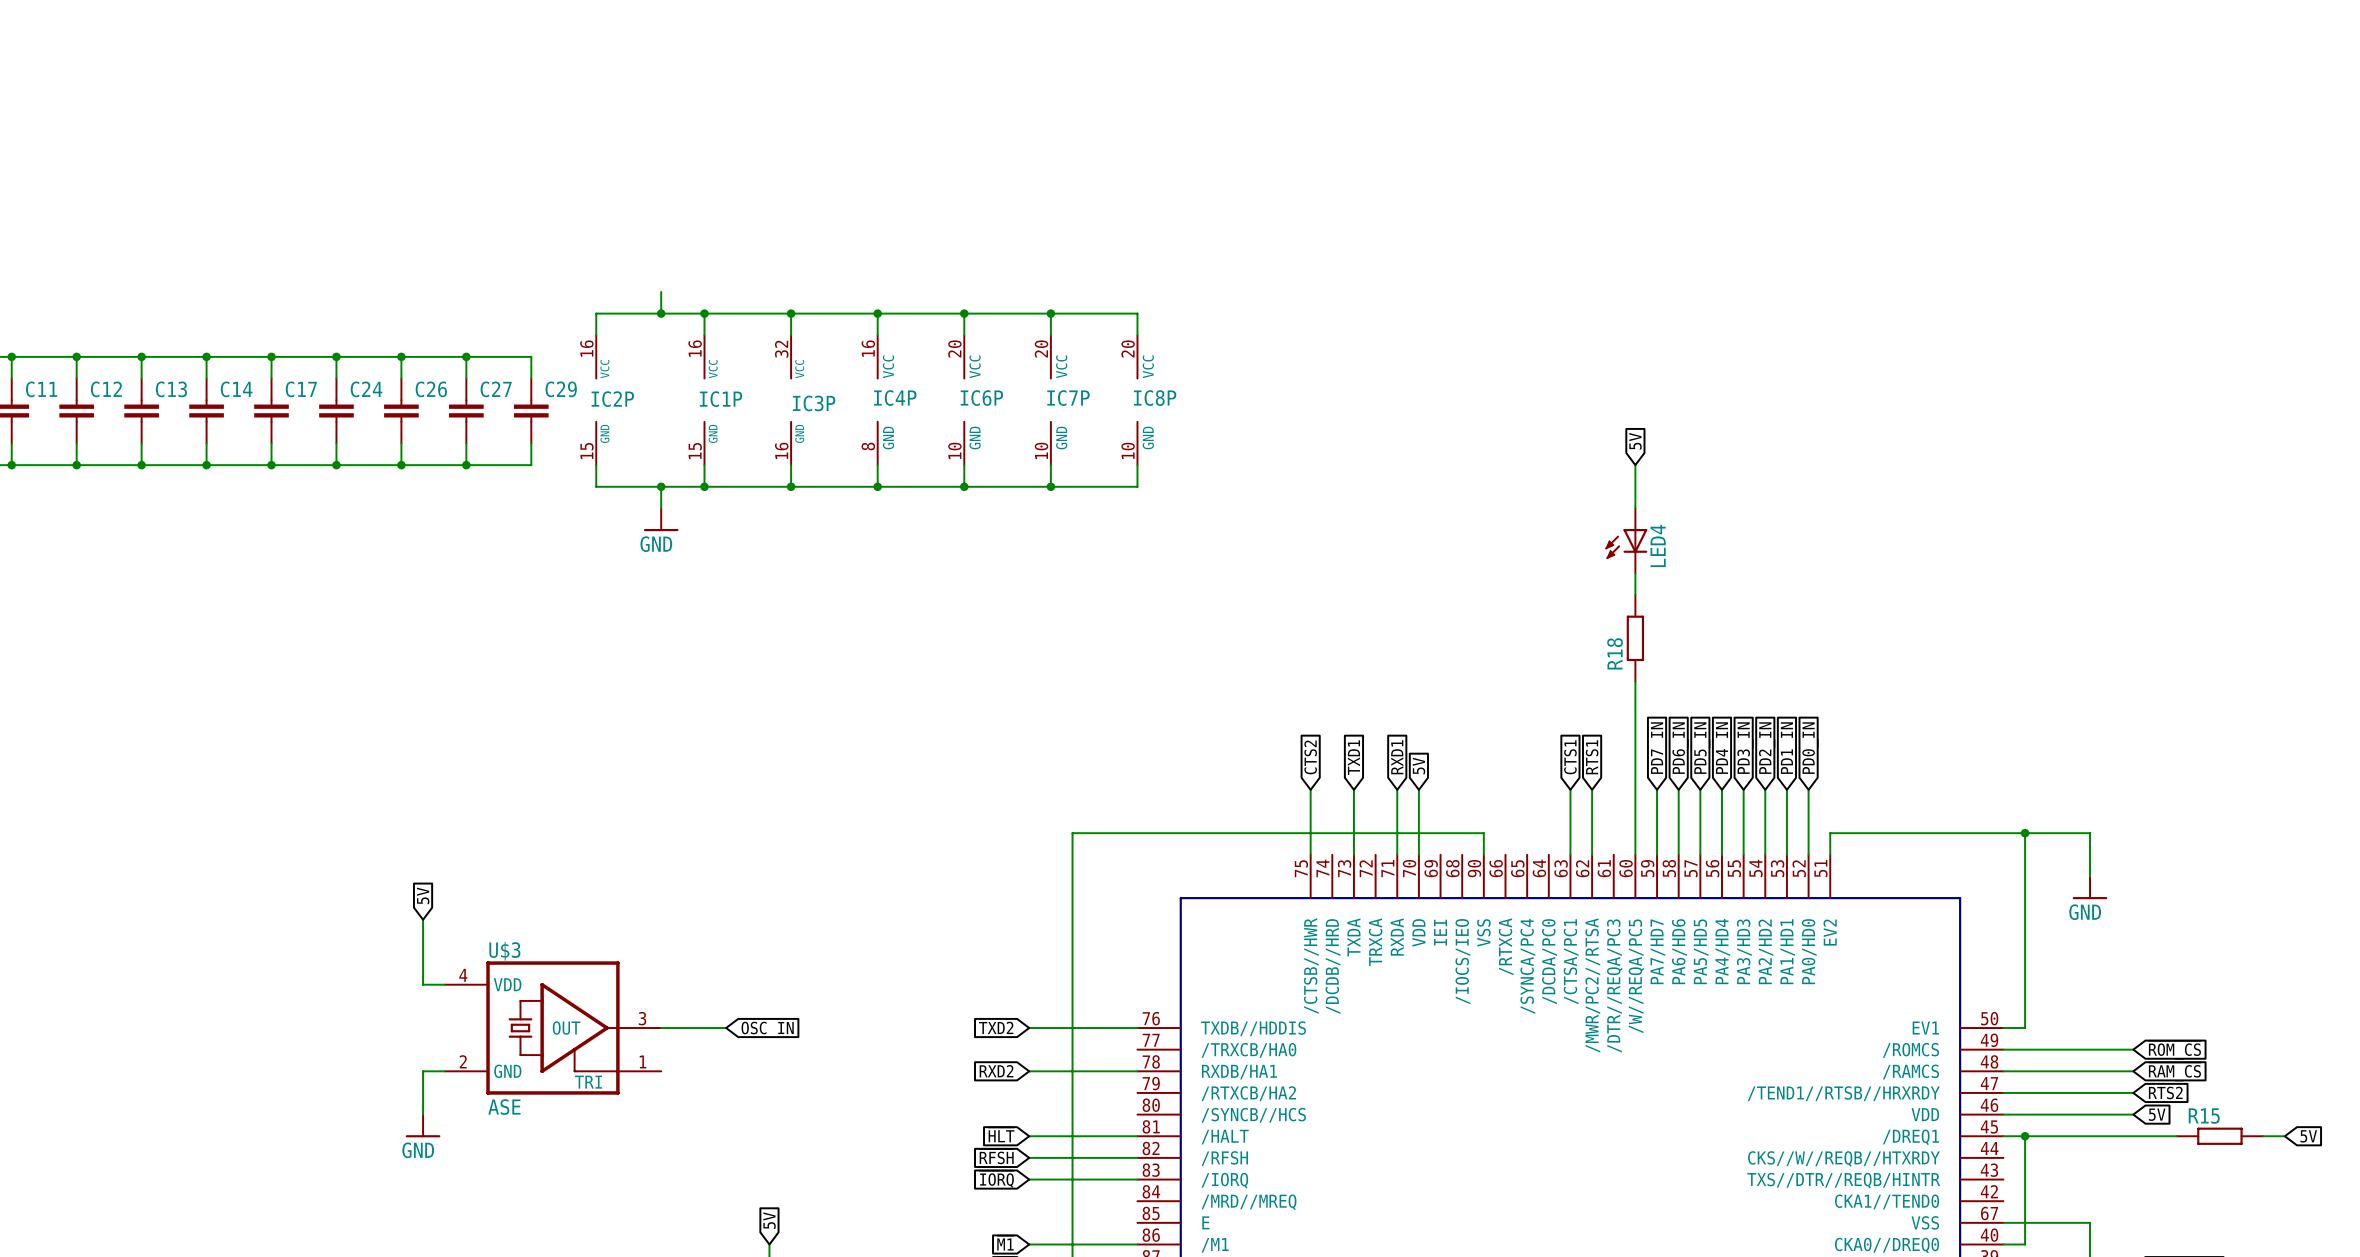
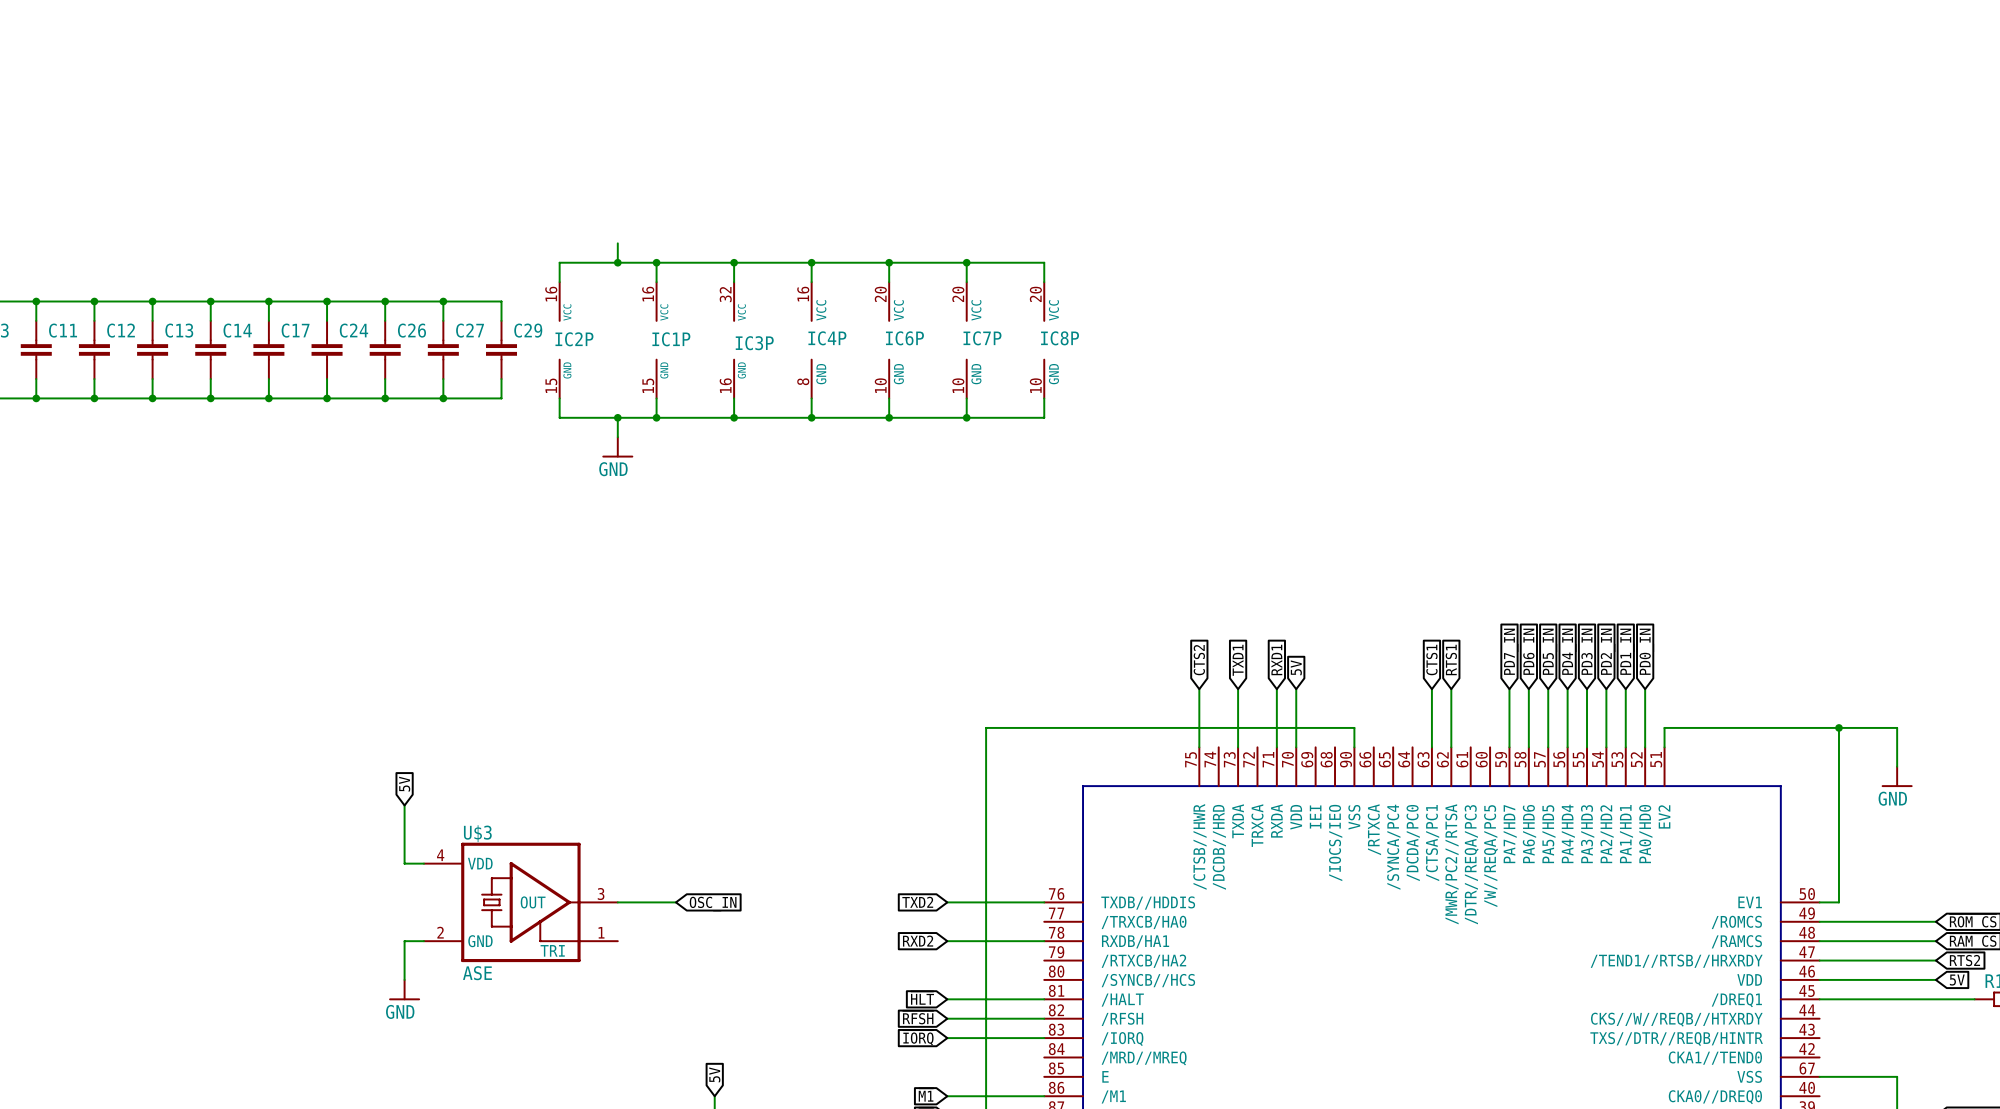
global label: 5V (1635, 441) -> none
wire: (1635, 465) (1635, 508) -> none
LED4: (1626, 540) -> none
wire: (1635, 573) (1635, 595) -> none
R18: (1635, 638) -> none
wire: (1635, 681) (1635, 854) -> none
wire: (2025, 1136) (2025, 1244) (2003, 1244) -> none
junction: (2025, 1136) -> none

